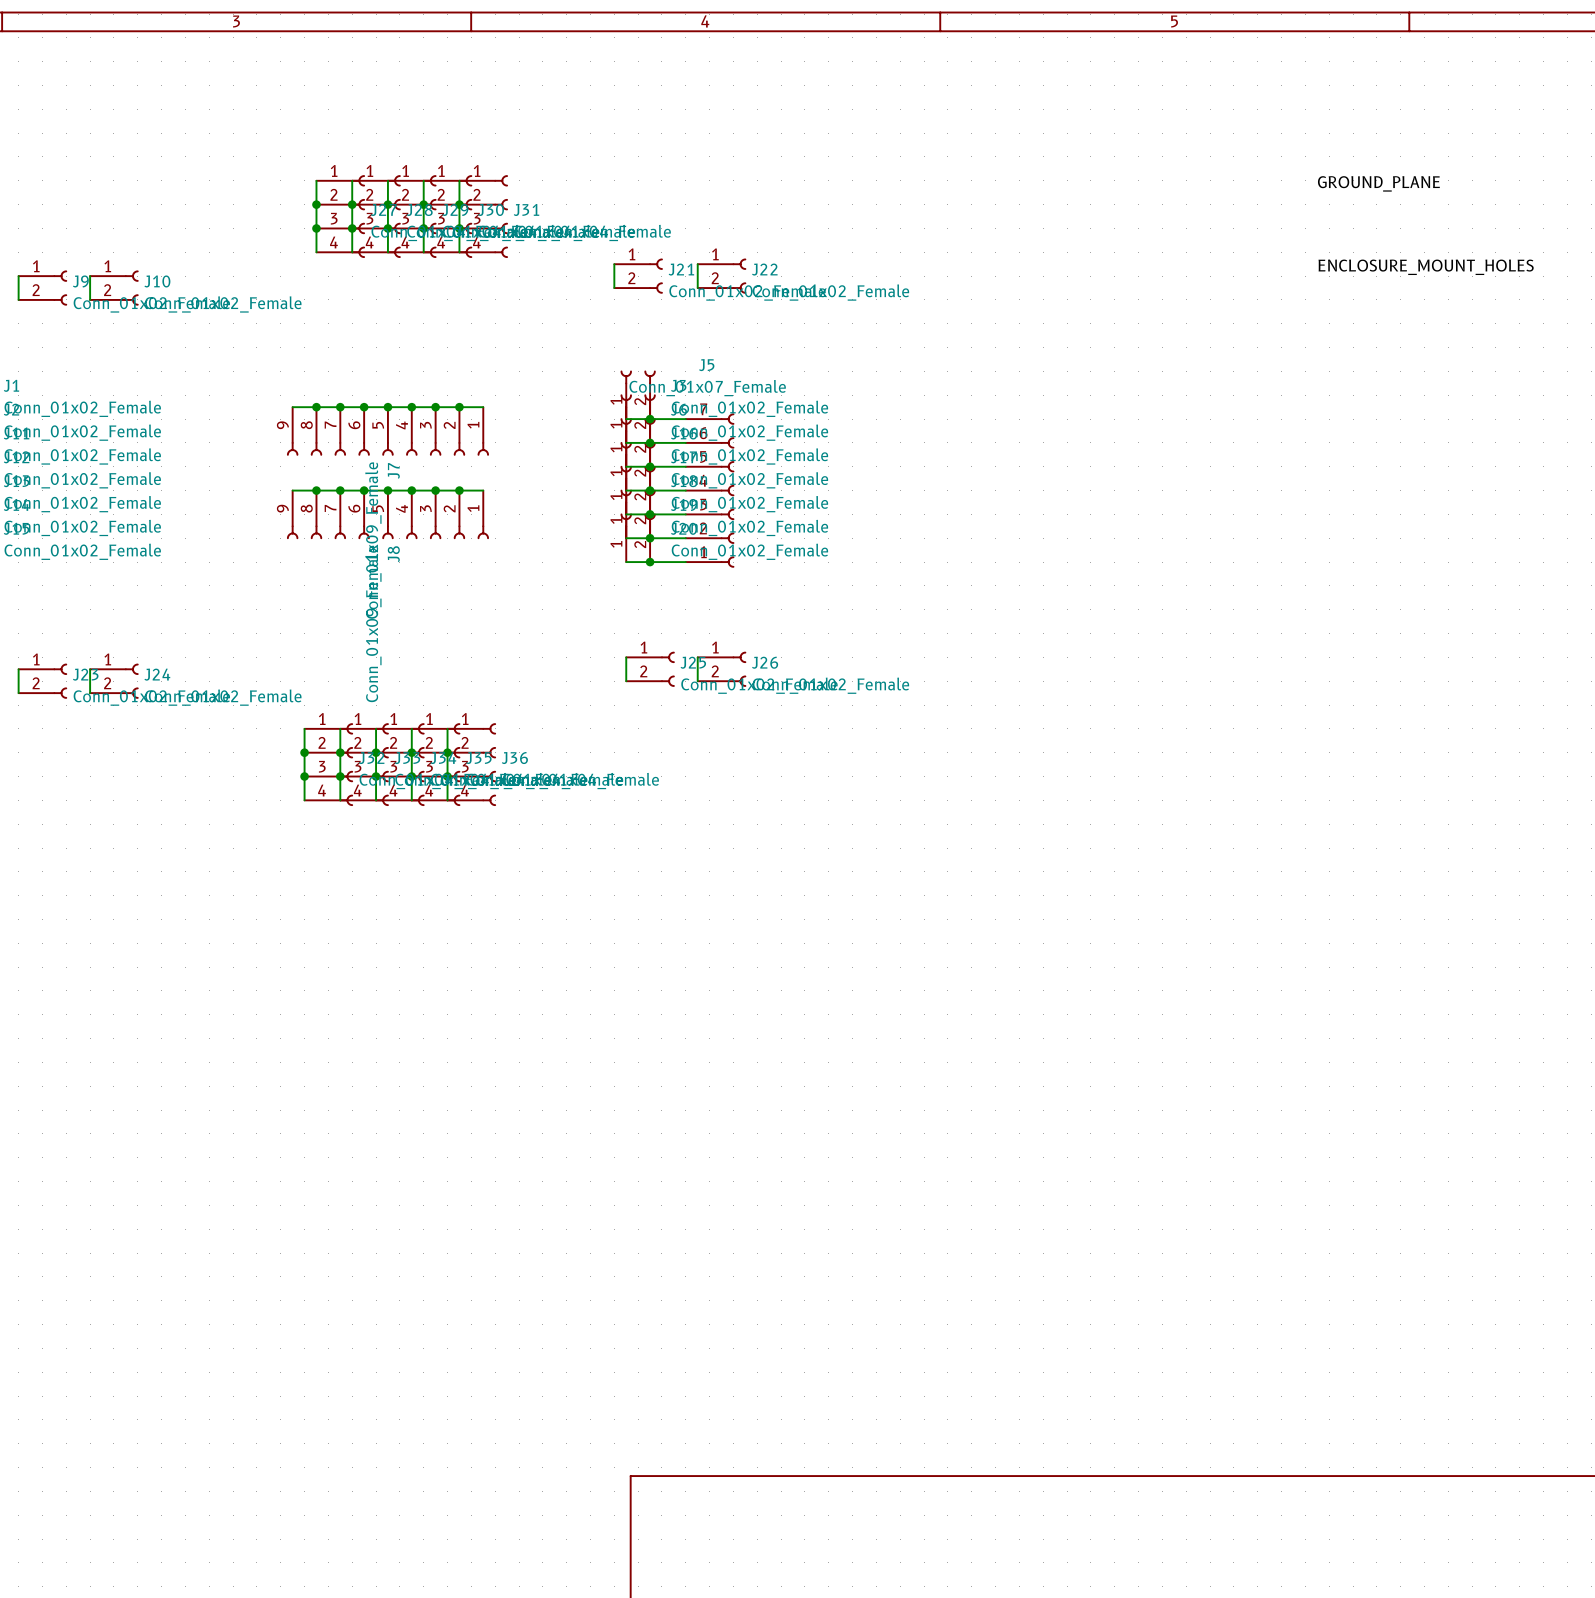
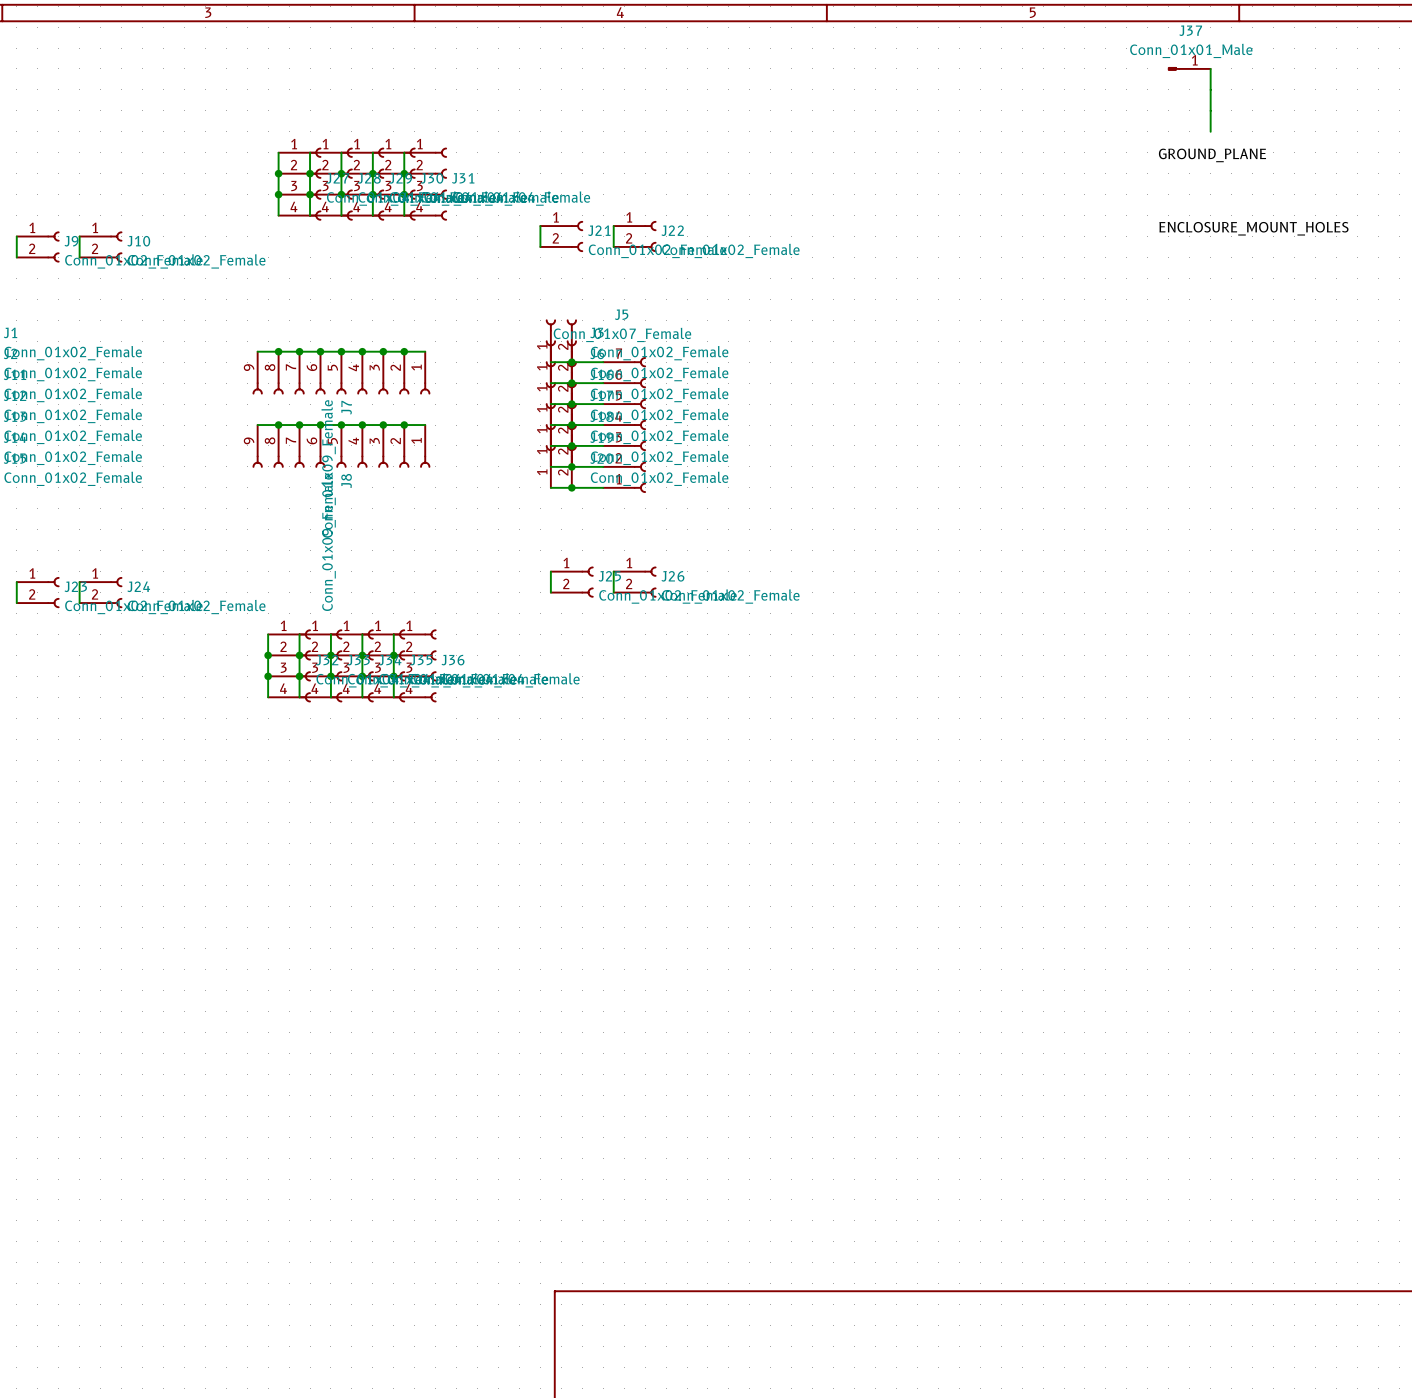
J37: none -> Conn_01x01_Male (1189, 68)
wire: none -> (1210, 68) (1210, 131)

